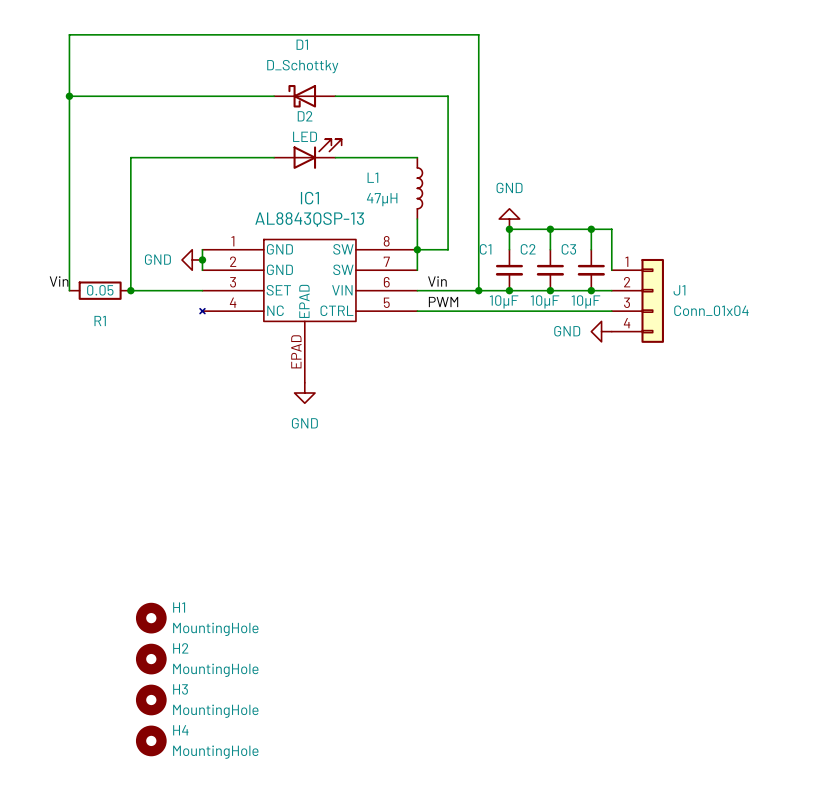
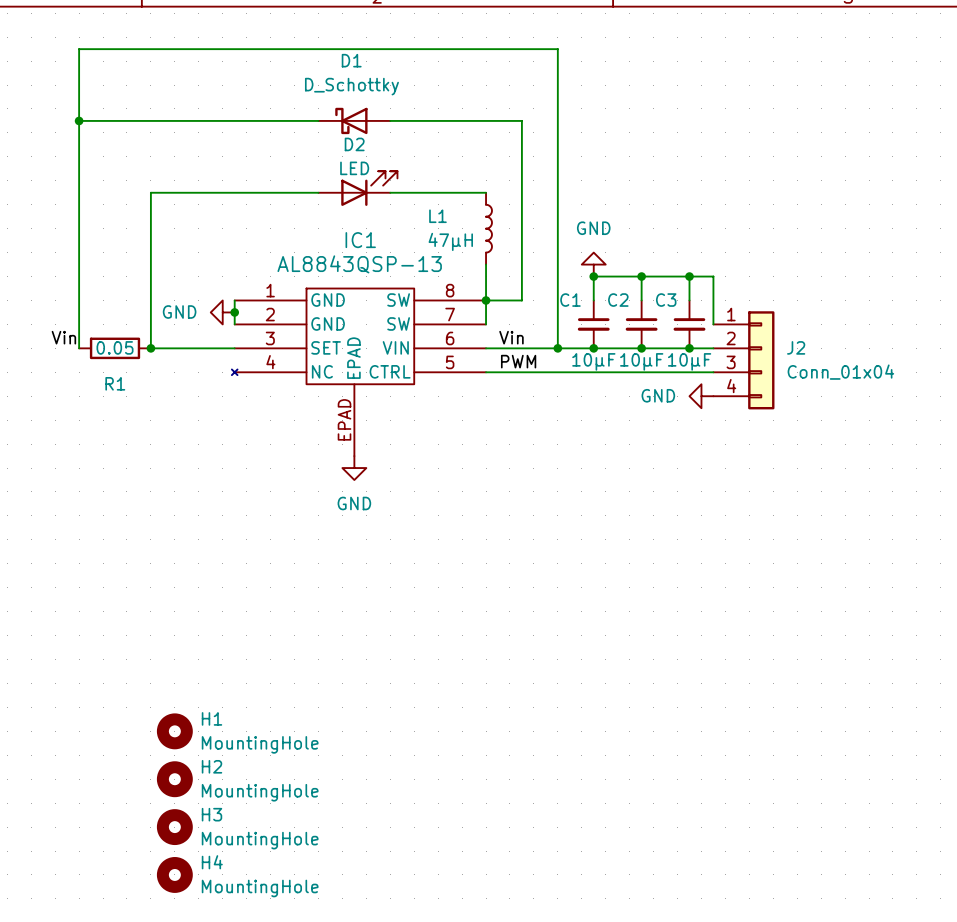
J1 name: J1 (679, 290) -> J2 (796, 347)

